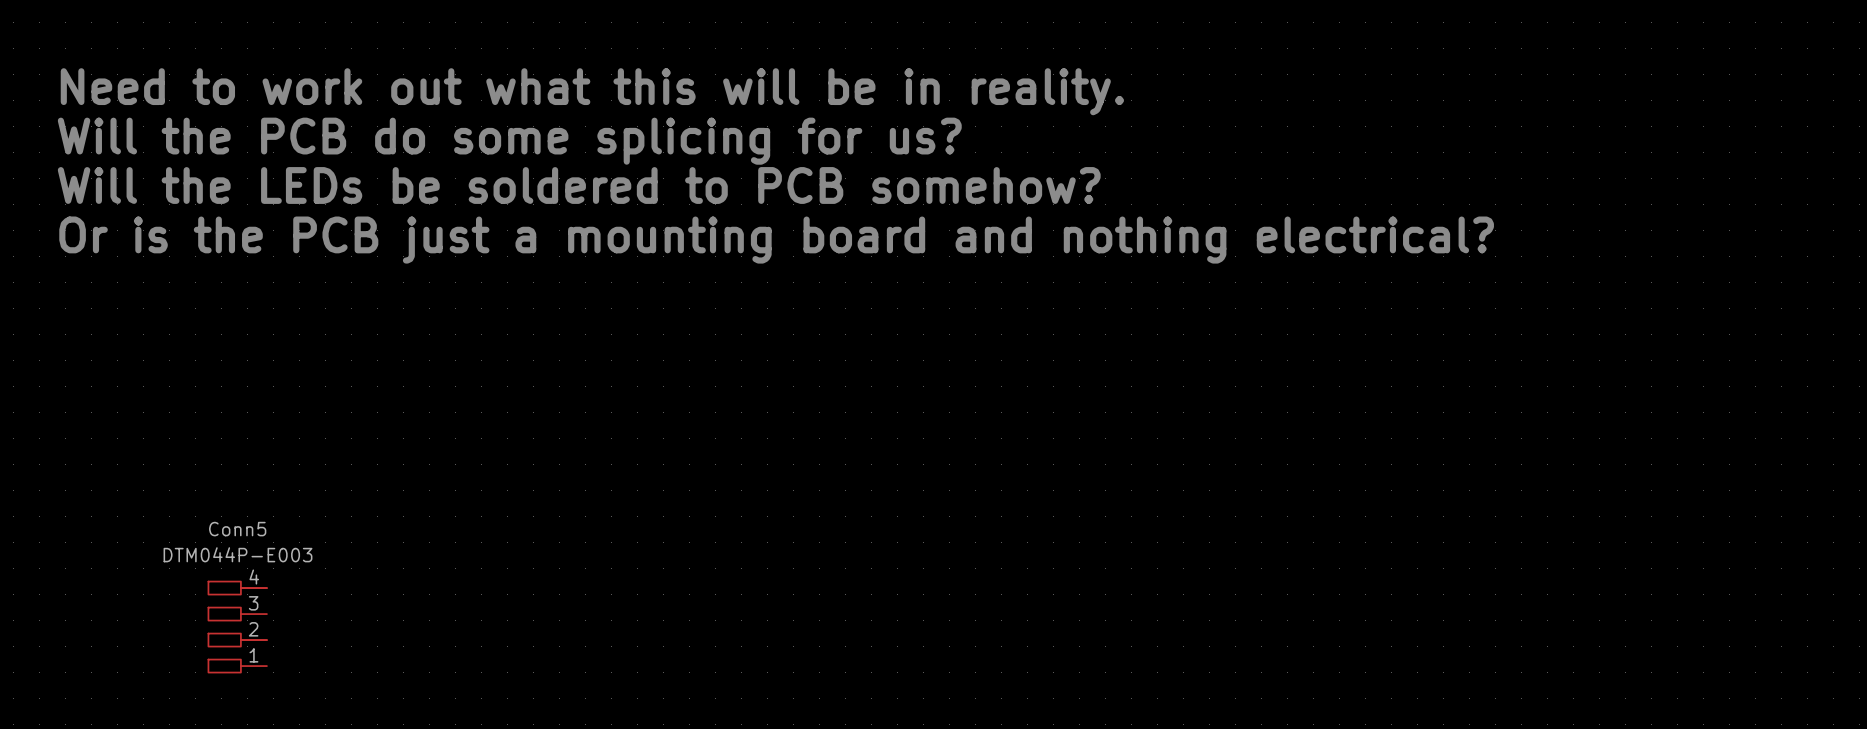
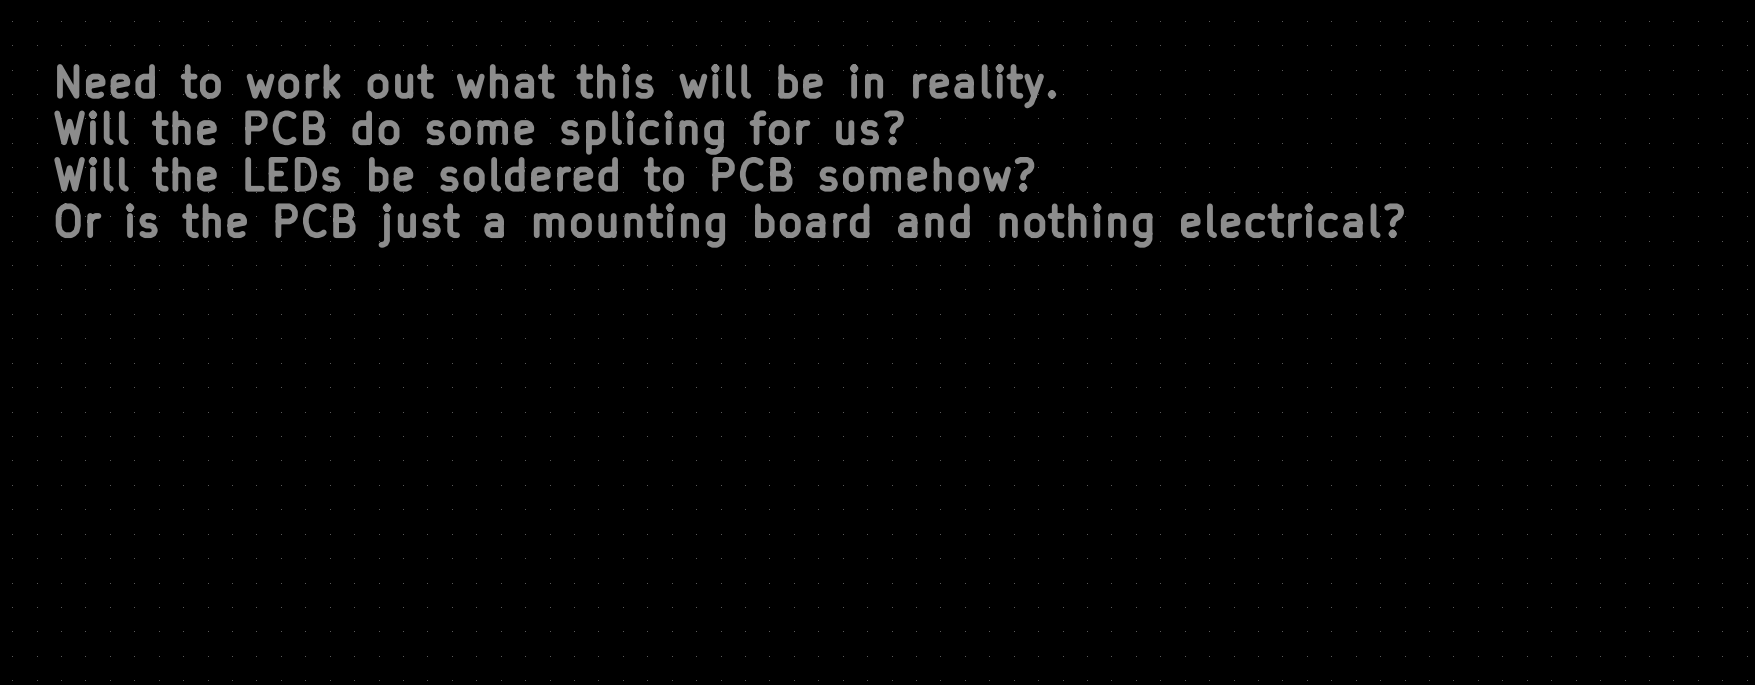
Conn5: (237, 627) -> none

